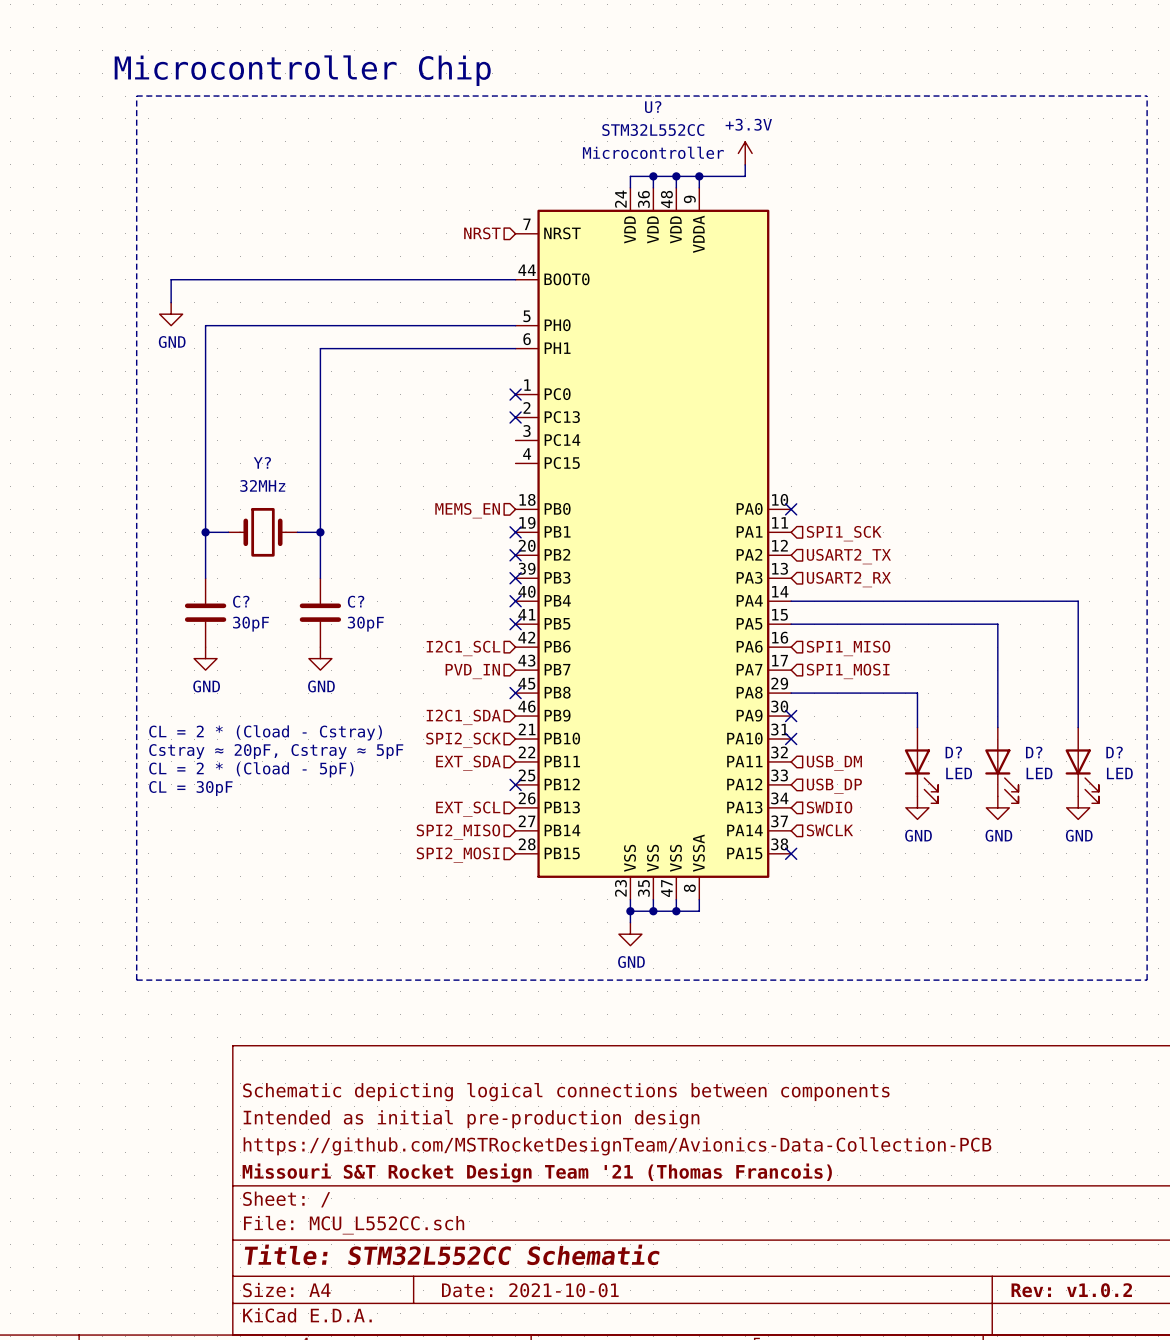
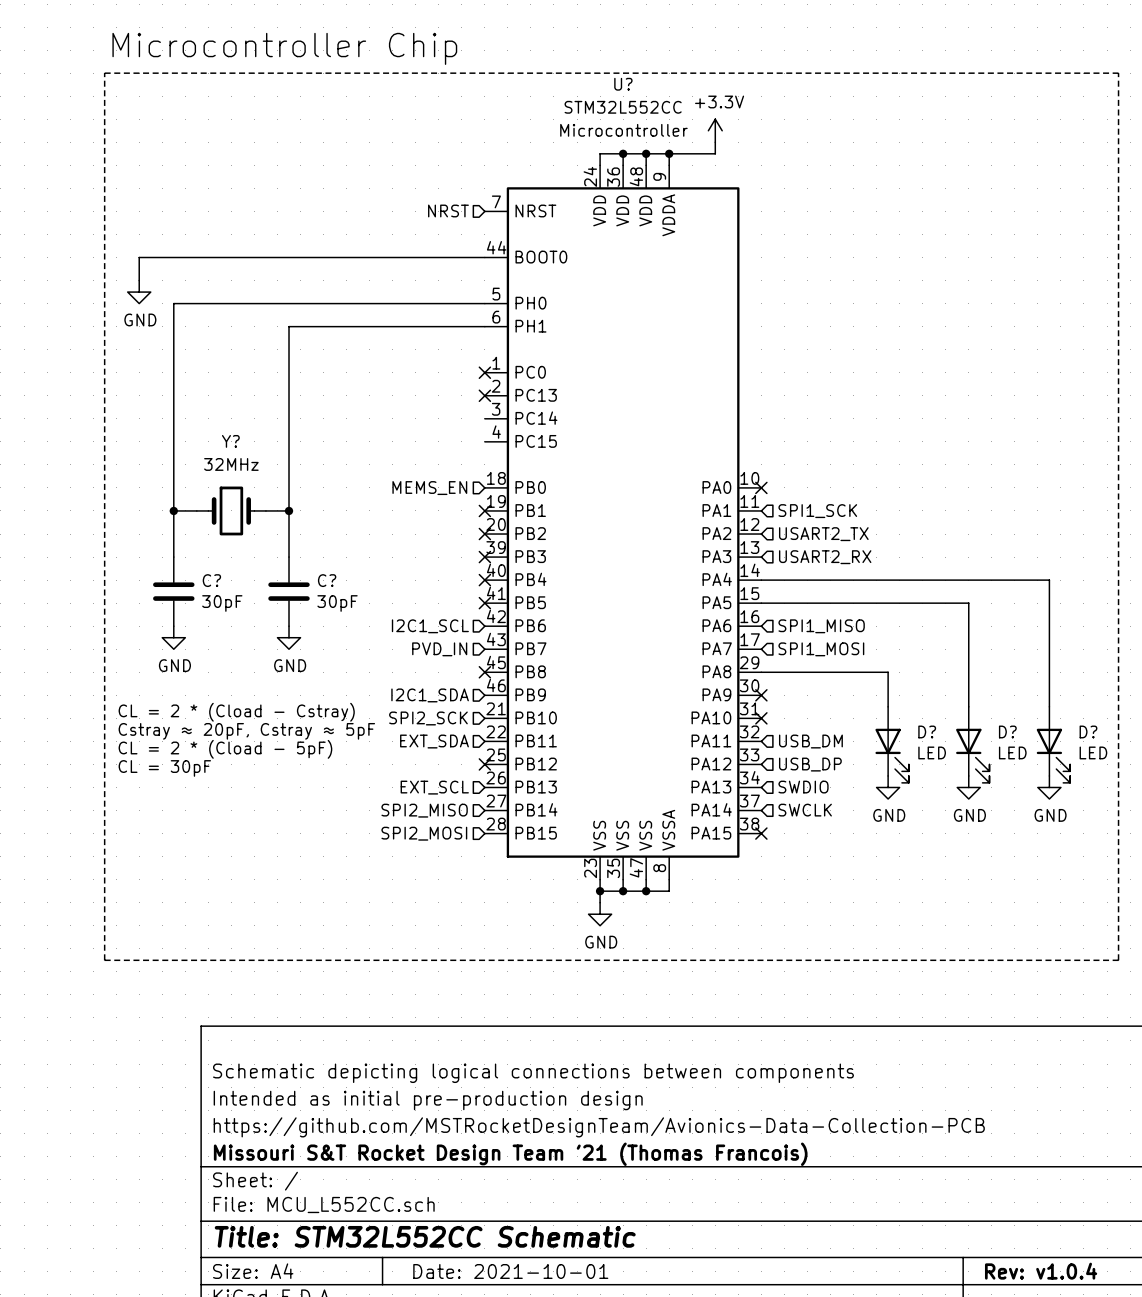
title block: Rev: v1.0.2 (1071, 1290) -> Rev: v1.0.4 (1041, 1271)

